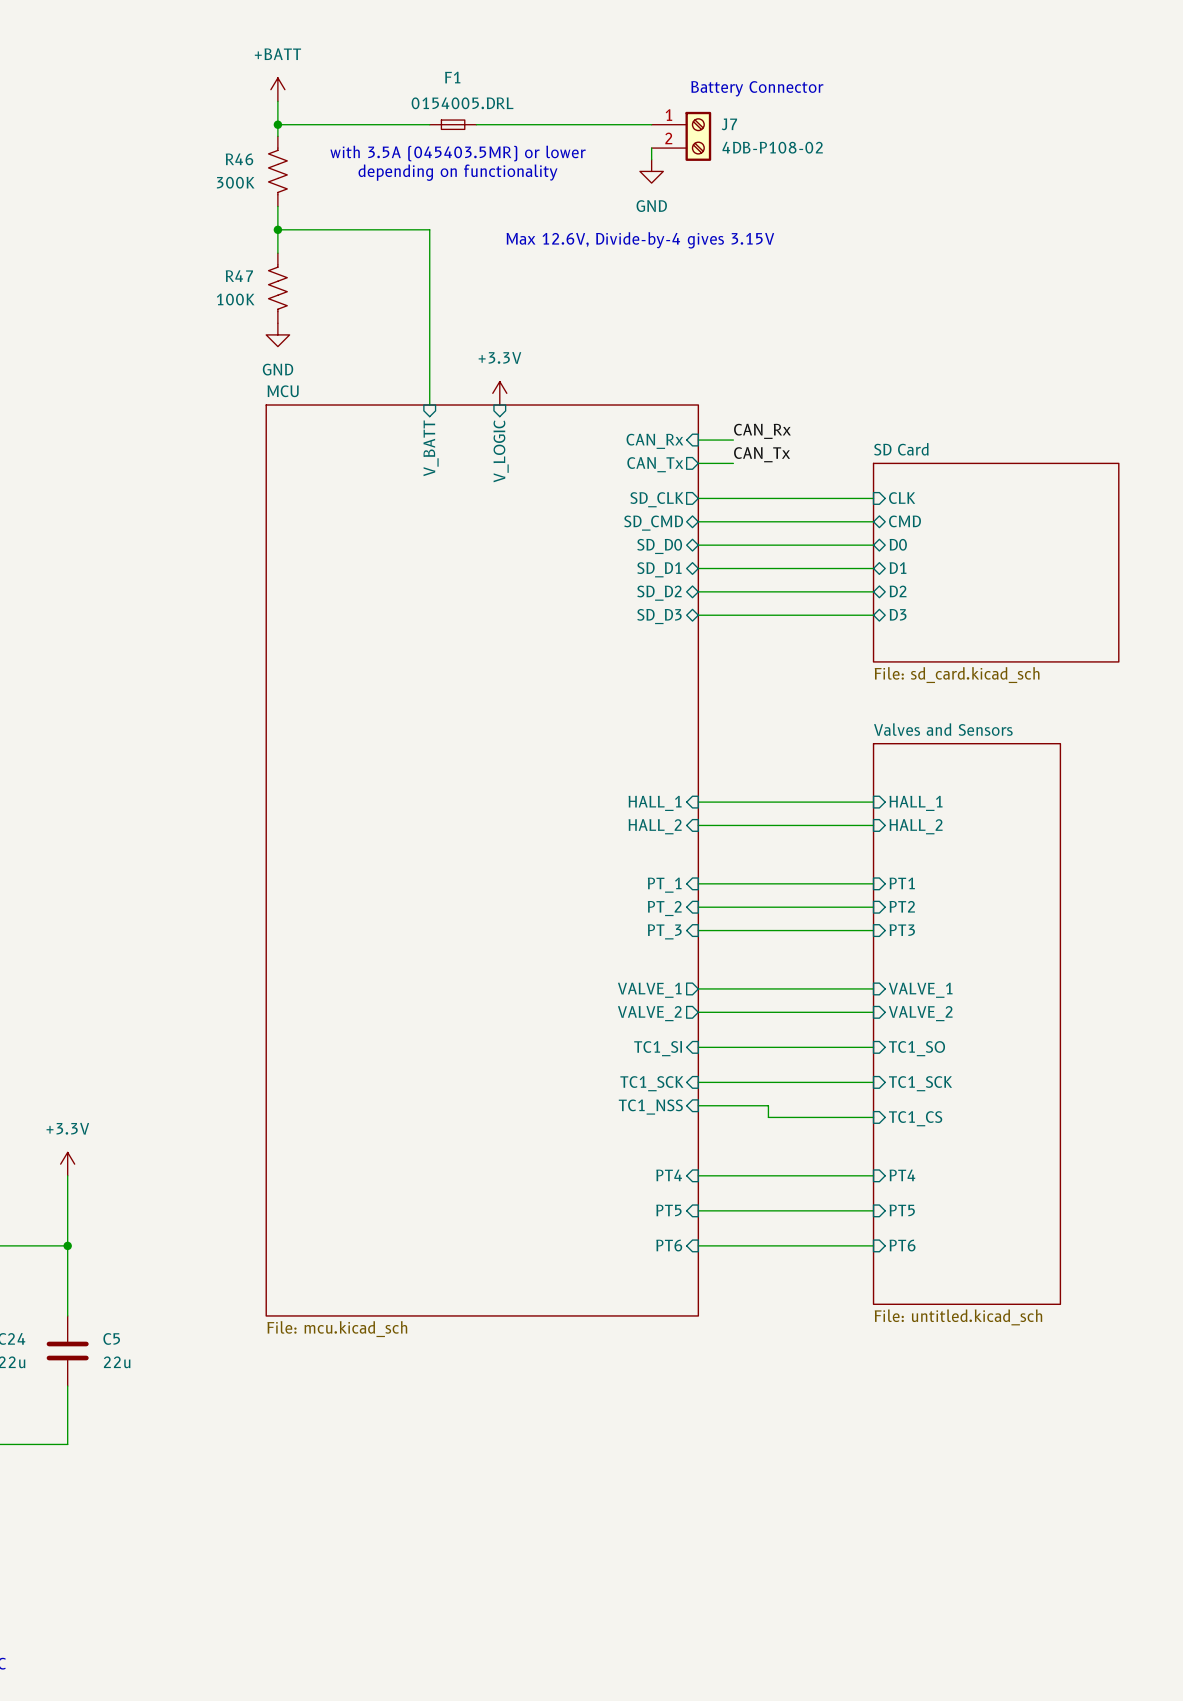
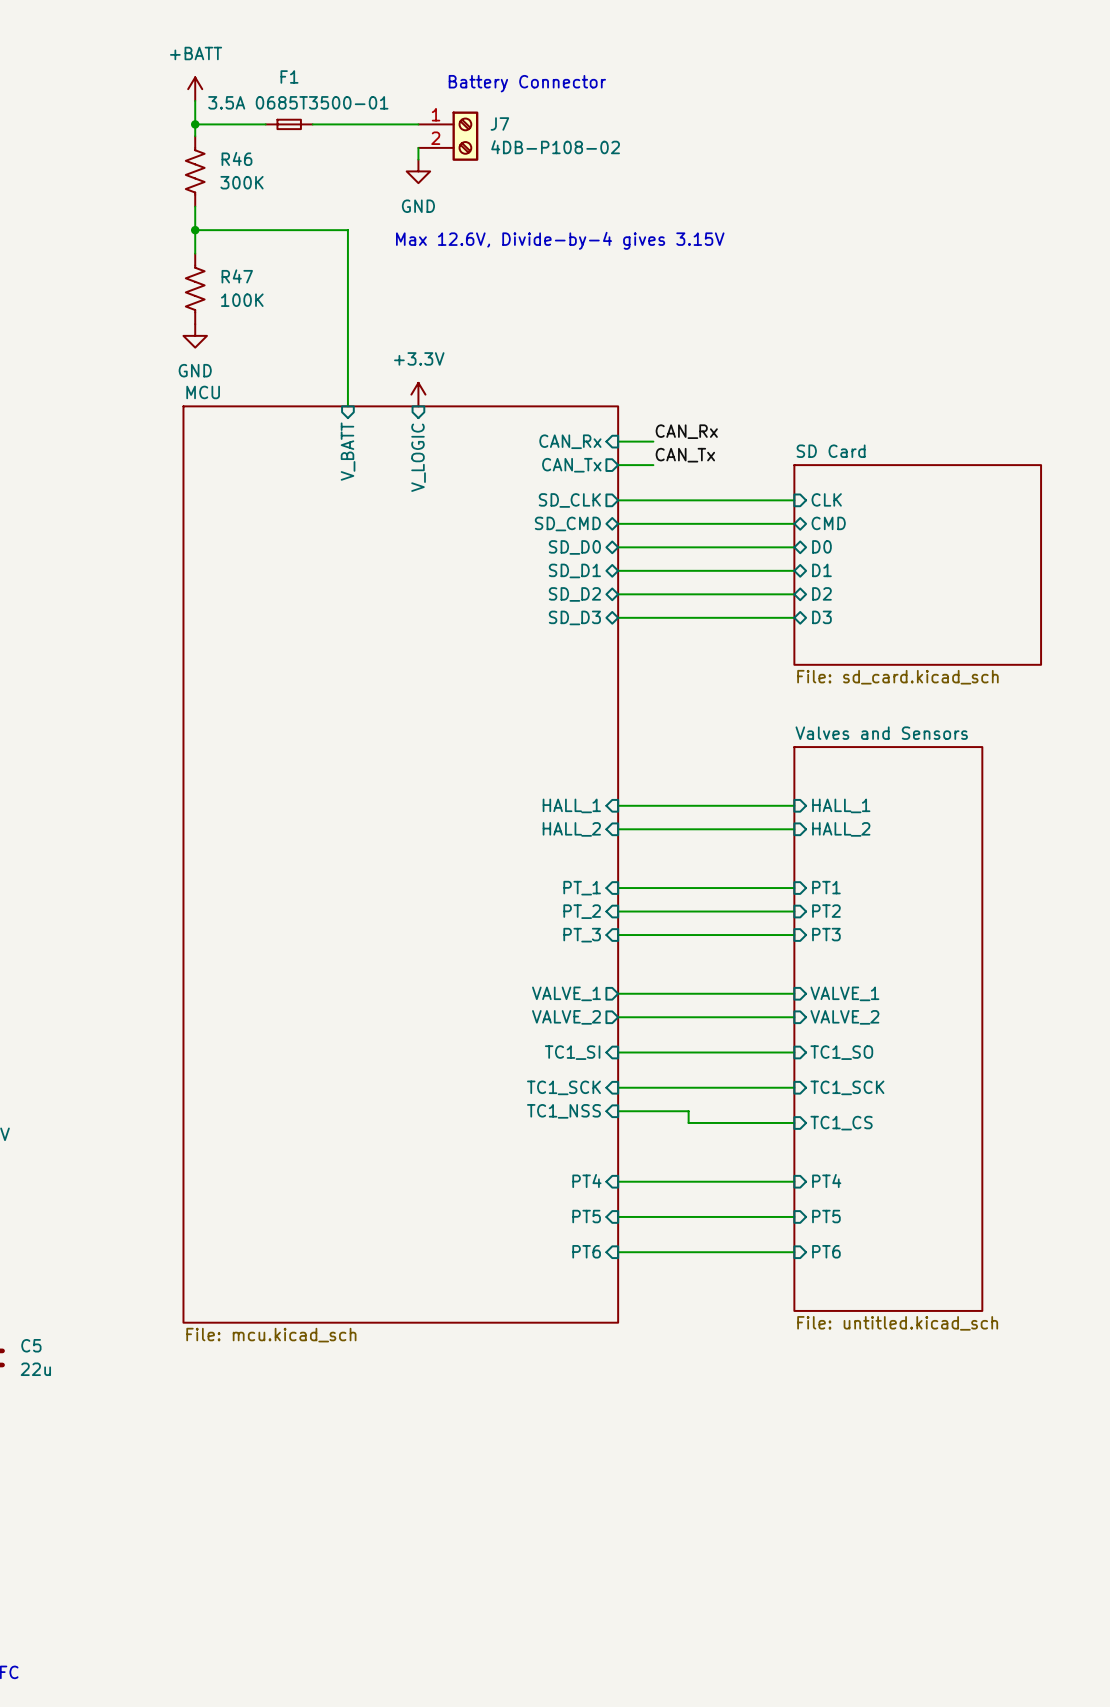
text position: Battery Connector (757, 88) -> Battery Connector (527, 83)
F1 value: 0154005.DRL (462, 103) -> 3.5A 0685T3500-01 (298, 102)
F1 position: (453, 124) -> (289, 124)
wire: (499, 124) (651, 124) -> none
J7 position: (681, 136) -> (448, 136)
wire: (651, 148) (651, 159) -> (418, 147) (418, 159)
text: with 3.5A (045403.5MR) or lower (458, 153) -> none
R46 flip: as is (277, 171) -> left-right (195, 171)
power symbol position: GND (651, 171) -> GND (418, 171)
text: depending on functionality (457, 172) -> none
R47 flip: as is (277, 288) -> left-right (195, 288)

